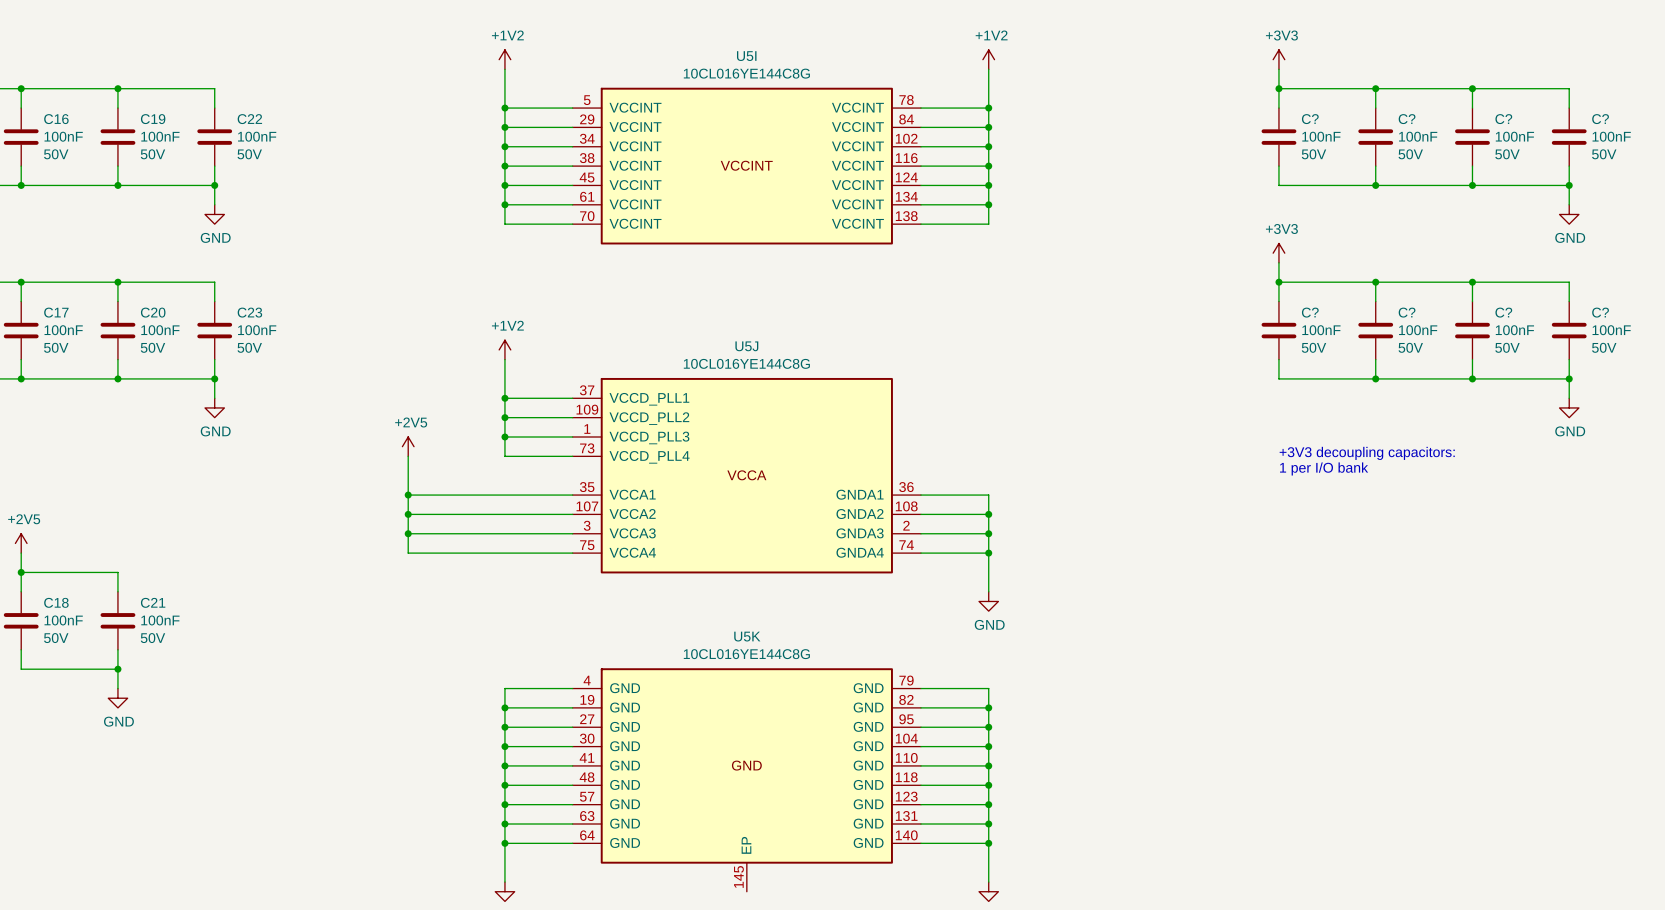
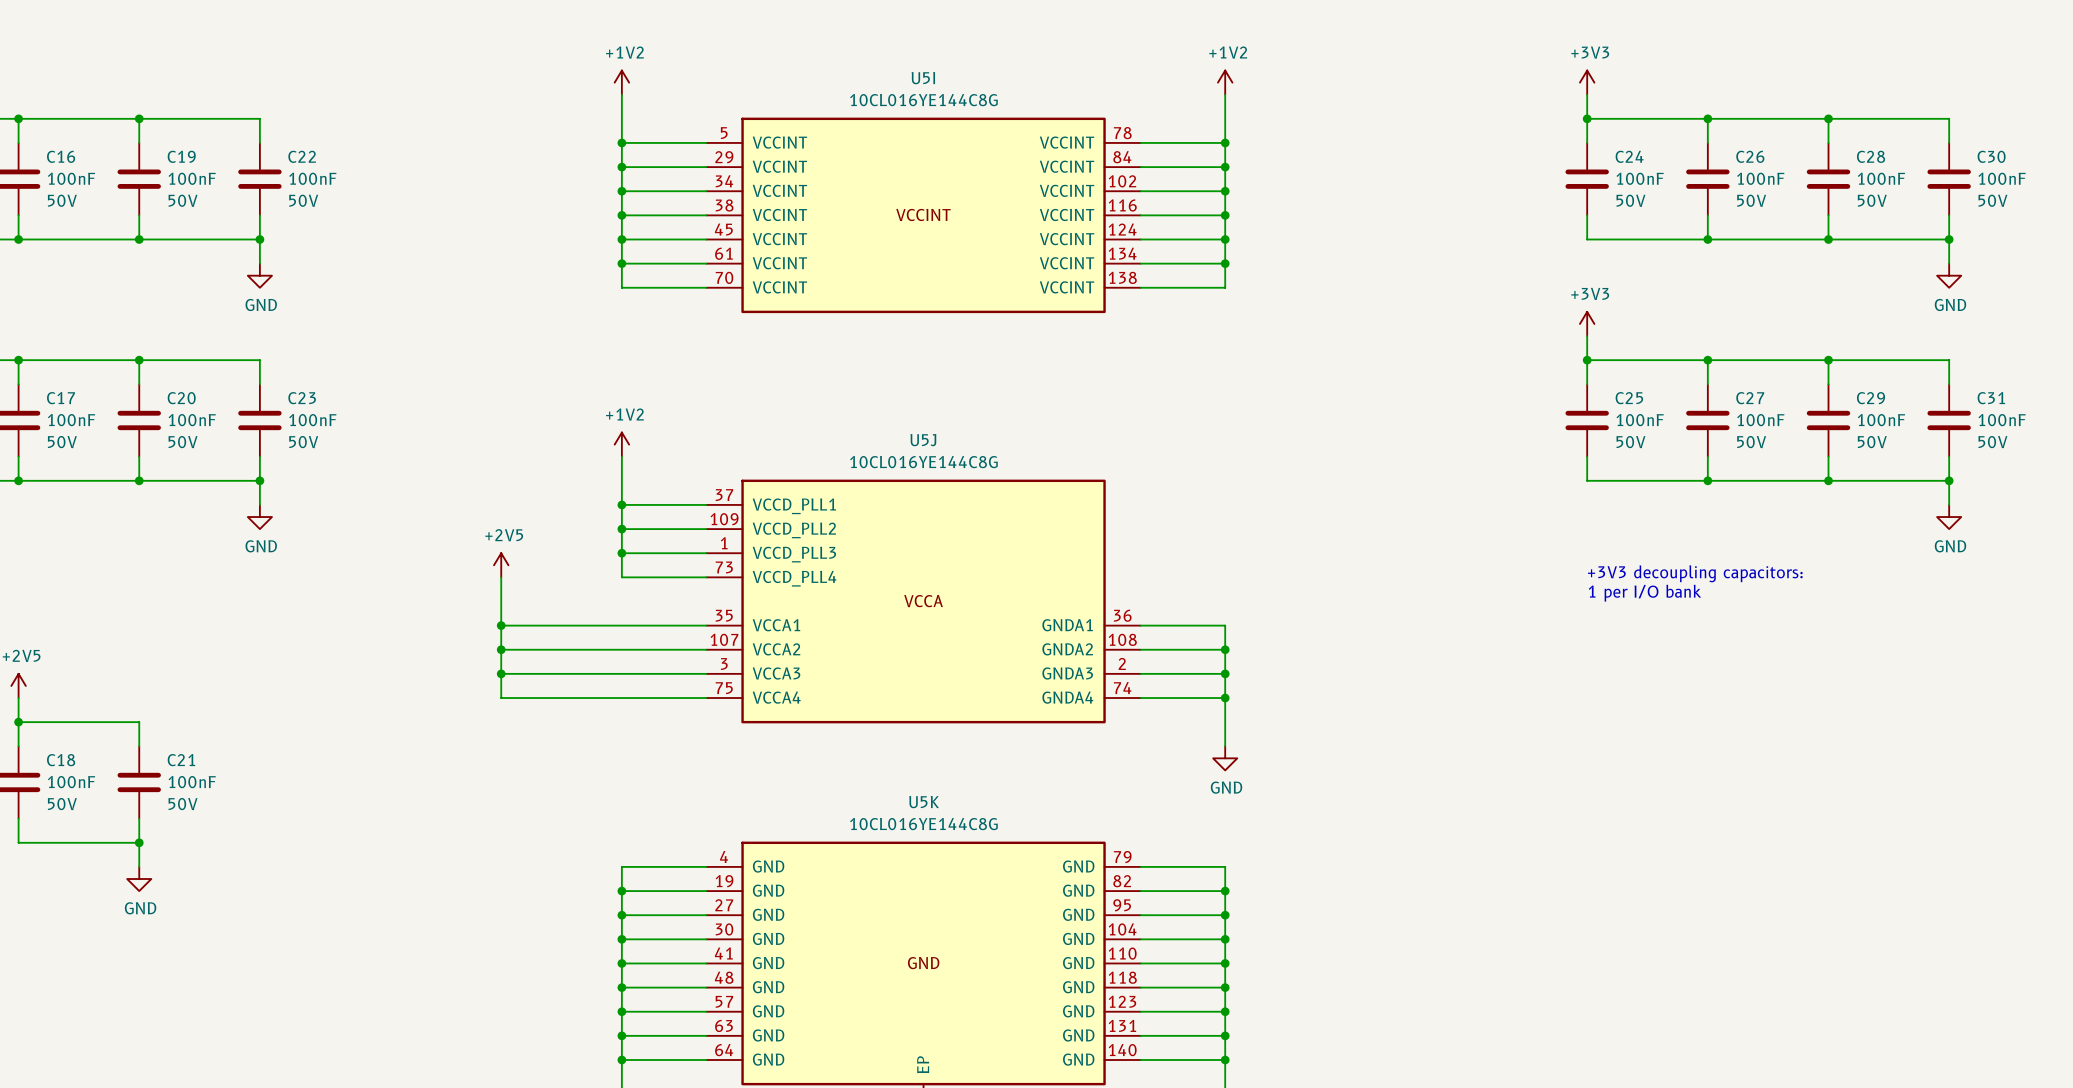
C? name: C? (1310, 119) -> C24 (1629, 156)
C? name: C? (1407, 119) -> C26 (1750, 156)
C? name: C? (1503, 119) -> C28 (1871, 156)
C? name: C? (1600, 119) -> C30 (1991, 156)
C? name: C? (1310, 312) -> C25 (1629, 398)
C? name: C? (1407, 312) -> C27 (1750, 398)
C? name: C? (1503, 312) -> C29 (1870, 398)
C? name: C? (1600, 312) -> C31 (1991, 398)

